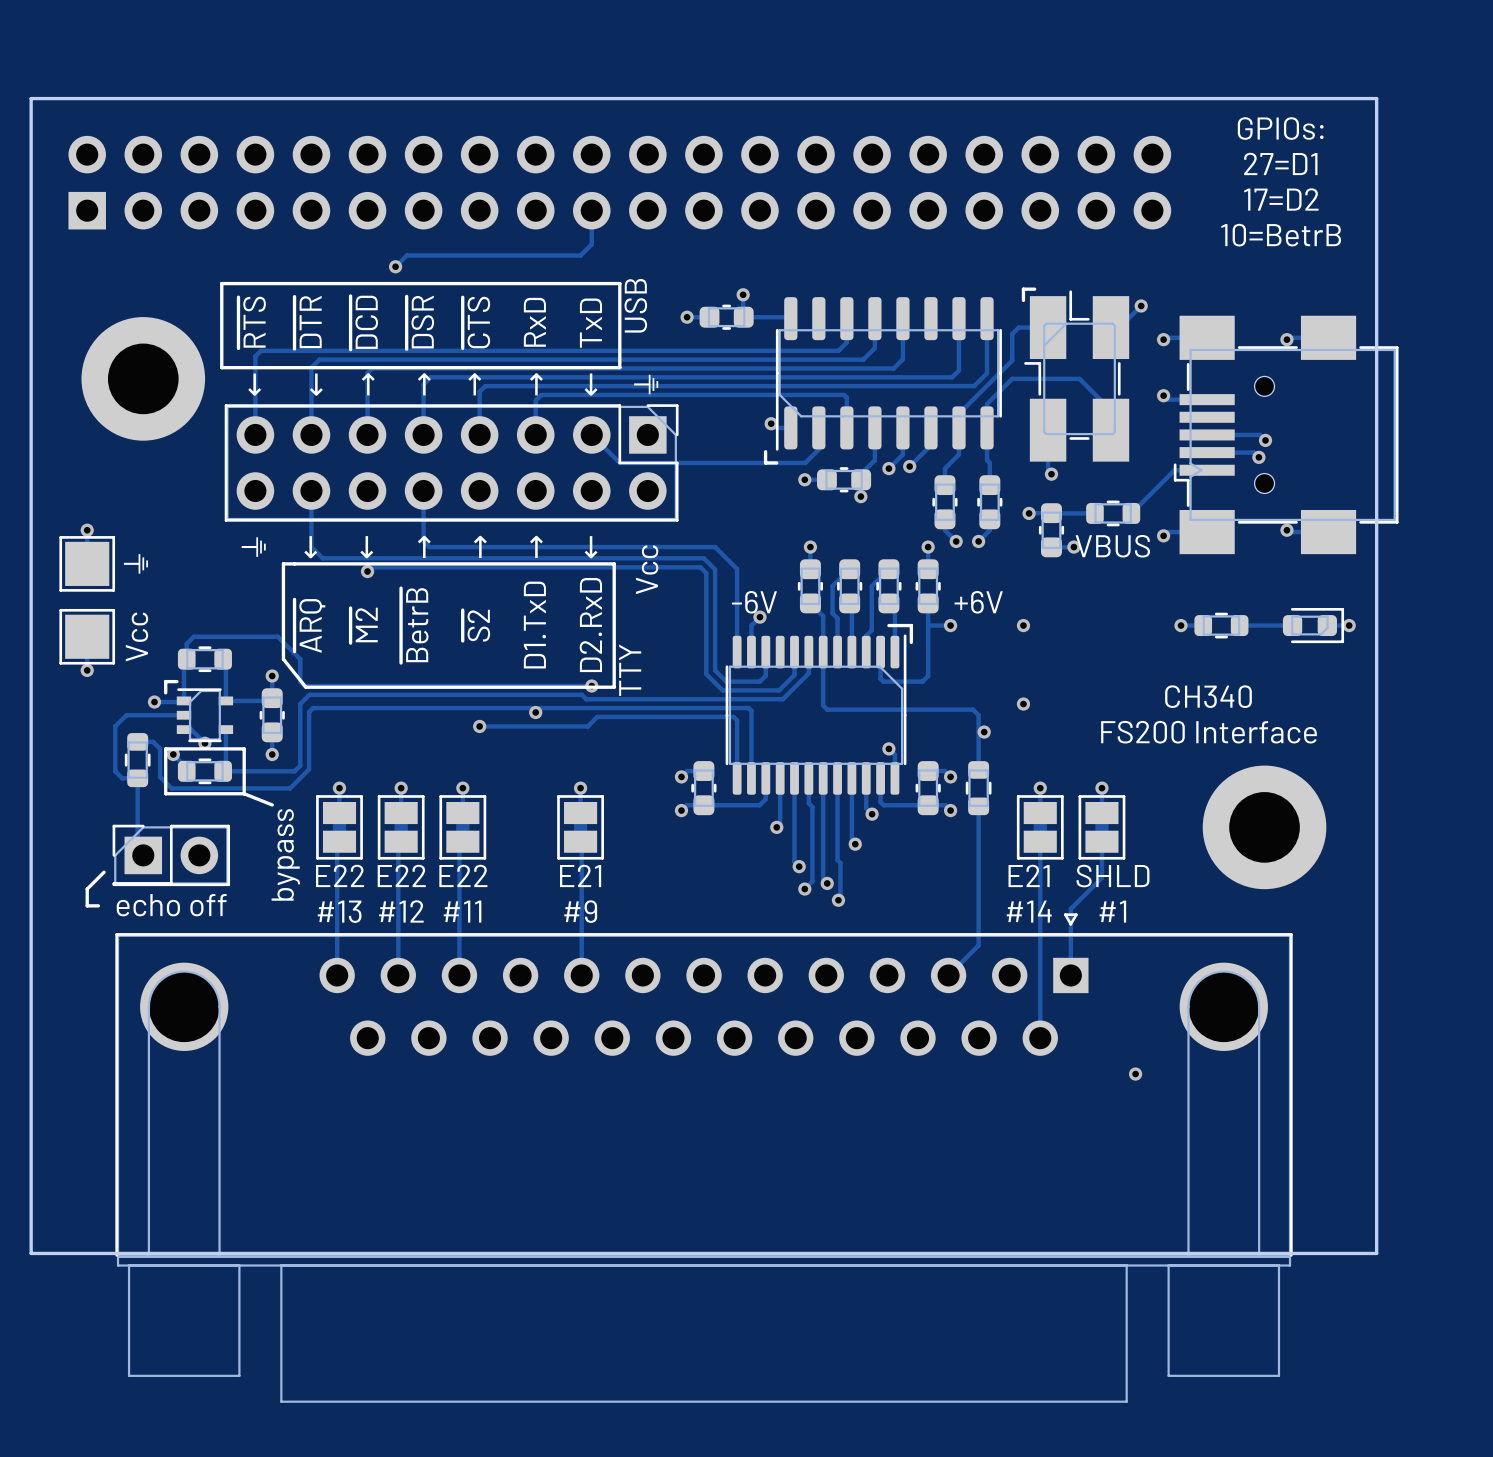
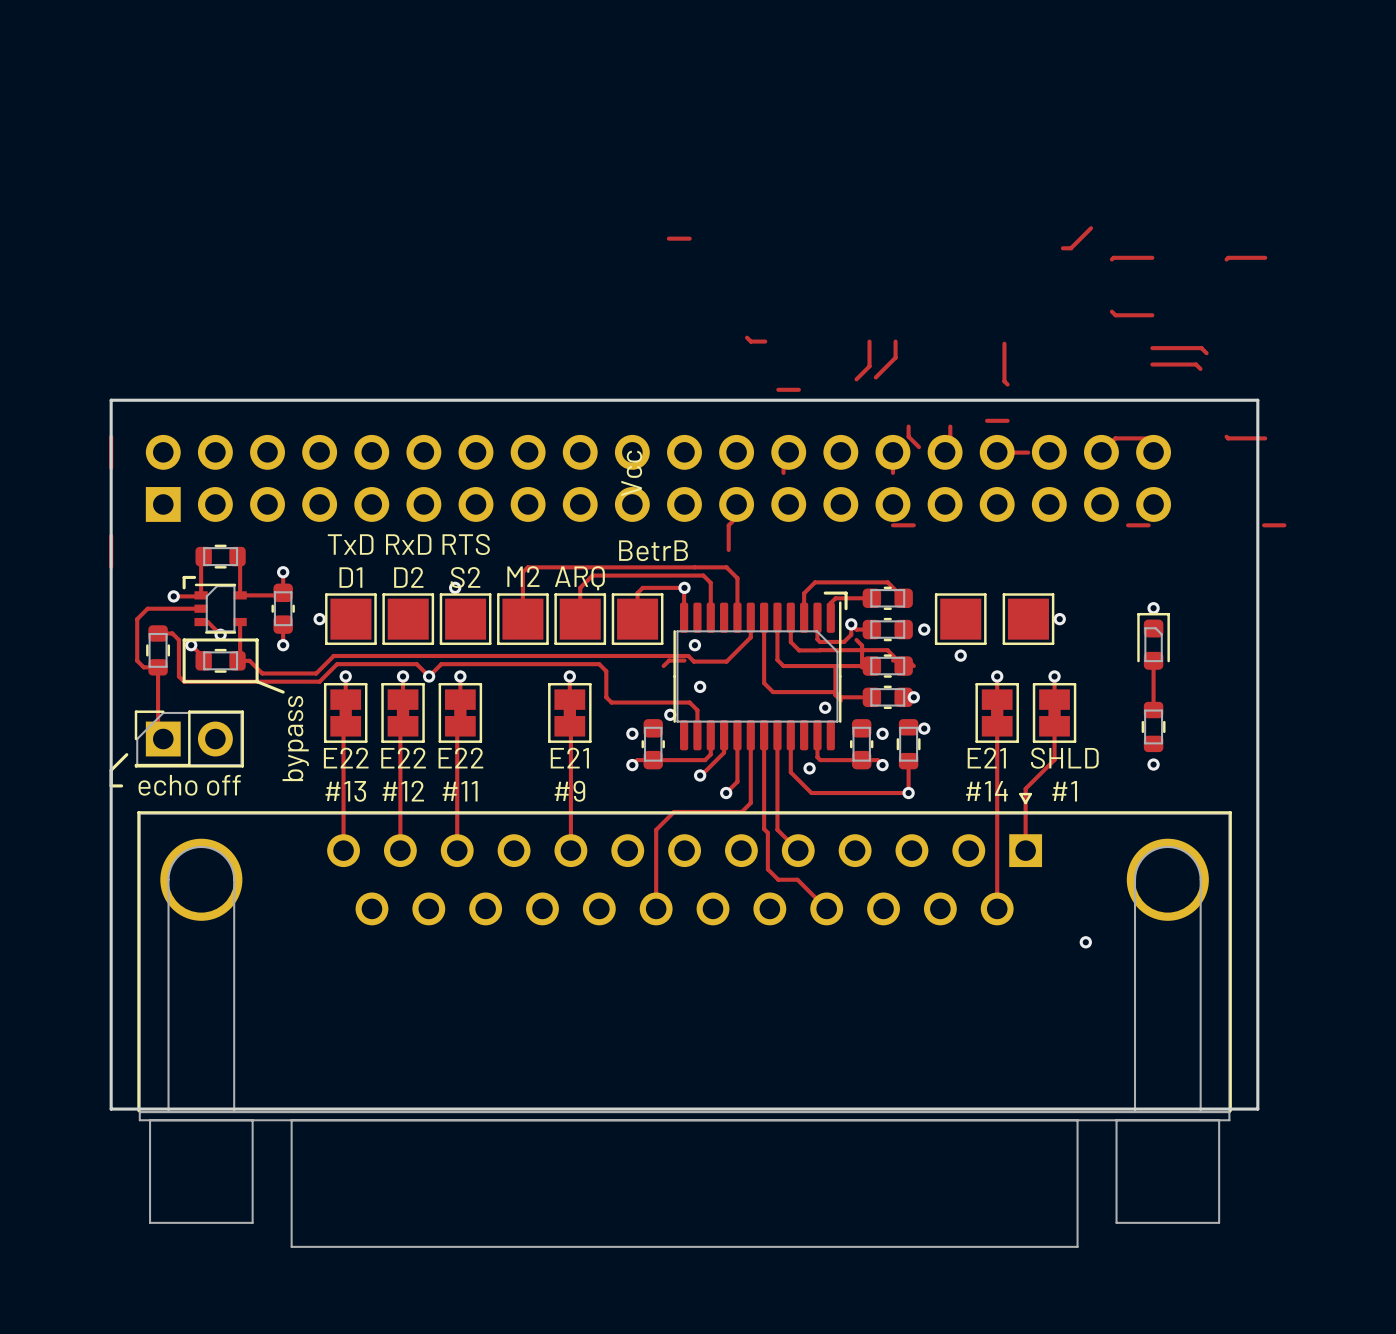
text: GPIOs: (1280, 128) -> none
text: 27=D1 (1280, 163) -> none
part position: (619, 182) -> (658, 478)
text: 17=D2 (1281, 199) -> none
track: (591, 210) (591, 244) (580, 255) (406, 255) (395, 266) -> none
text: 10=BetrB (1281, 235) -> none
via: (395, 266) -> none
line: (221, 283) (221, 367) (619, 367) (619, 283) (221, 283) -> none
line: (1034, 289) (1023, 289) (1023, 300) -> none
track: (743, 294) (743, 317) (789, 317) -> none
via: (743, 294) -> none
text: USB (635, 305) -> none
via: (1141, 306) -> none
via: (687, 317) -> none
part: (726, 317) -> none
track: (846, 318) (846, 342) (838, 350) (261, 350) (255, 356) (255, 434) -> none
track: (874, 318) (874, 348) (863, 359) (319, 359) (311, 367) (311, 434) -> none
track: (902, 318) (902, 359) (893, 368) (372, 368) (367, 373) (367, 434) -> none
track: (958, 318) (958, 370) (952, 377) (430, 377) (423, 384) (423, 434) -> none
track: (987, 318) (987, 373) (974, 386) (485, 386) (479, 391) (479, 434) -> none
text: ~{RTS} (252, 322) -> none
text: ~{DTR} (308, 322) -> none
text: ~{DCD} (364, 322) -> none
text: ~{DSR} (420, 322) -> none
text: ~{CTS} (476, 322) -> none
text rotation: 0° (534, 322) -> 90° clockwise (408, 544)
text position: RxD (534, 322) -> RxD (408, 544)
text rotation: 0° (590, 323) -> 90° clockwise (350, 544)
text position: TxD (590, 323) -> TxD (350, 544)
track: (1048, 327) (1018, 327) (1012, 334) (1012, 360) (958, 413) (958, 454) (944, 468) (944, 485) -> none
via: (1163, 339) -> none
via: (1286, 339) -> none
part: (888, 373) -> none
part: (1076, 376) -> none
part: (143, 378) -> none
text: → (254, 384) -> none
text: → (316, 384) -> none
text: → (368, 384) -> none
text: → (424, 384) -> none
text: → (474, 384) -> none
text: → (536, 384) -> none
text: → (591, 384) -> none
text: ⏚ (646, 384) -> none
via: (1163, 395) -> none
via: (771, 423) -> none
track: (818, 427) (818, 449) (805, 462) (619, 462) (591, 434) -> none
track: (846, 427) (846, 397) (844, 394) (541, 394) (535, 400) (535, 434) -> none
track: (874, 427) (874, 460) (861, 473) -> none
track: (1110, 430) (1110, 410) (1079, 378) (1012, 378) (987, 404) (987, 460) (989, 462) (989, 485) -> none
part: (1286, 434) -> none
via: (1265, 440) -> none
line: (765, 451) (765, 462) (776, 462) -> none
via: (1258, 457) -> none
part: (451, 462) -> none
via: (909, 466) -> none
via: (888, 468) -> none
track: (1207, 470) (1174, 470) (1131, 513) -> none
via: (1051, 474) -> none
via: (804, 479) -> none
part: (844, 479) -> none
track: (311, 491) (311, 547) (322, 558) (703, 558) (715, 569) (715, 670) (724, 679) -> (580, 619) (580, 587) (592, 575) (703, 575)
track: (423, 491) (423, 541) (429, 547) (715, 547) (737, 569) (737, 652) -> none
via: (860, 496) -> none
part: (944, 502) -> none
part: (989, 502) -> none
via: (1029, 513) -> none
track: (1051, 513) (1094, 513) -> none
part: (1113, 513) -> none
via: (87, 530) -> none
part: (1051, 530) -> none
via: (1286, 530) -> none
via: (1163, 535) -> none
via: (956, 541) -> none
via: (978, 541) -> none
text: → (424, 546) -> none
text: → (480, 546) -> none
text: → (536, 546) -> none
text: VBUS (1112, 546) -> none
text: ⏚ (253, 547) -> none
text: → (310, 547) -> none
text: → (366, 547) -> none
text: → (591, 547) -> none
via: (810, 547) -> none
via: (928, 547) -> none
via: (1073, 547) -> none
part: (87, 563) -> none
text: ⏚ (135, 563) -> none
line: (283, 563) (614, 563) (614, 687) (305, 687) (283, 659) (283, 563) -> none
track: (849, 569) (832, 586) (832, 613) (837, 618) (837, 652) -> none
track: (888, 569) (871, 586) (871, 630) (866, 635) (866, 652) -> none
track: (367, 571) (371, 567) (700, 567) (706, 573) (706, 674) (722, 690) (779, 690) (794, 675) (794, 652) -> none
via: (367, 571) -> none
part: (810, 586) -> none
part: (849, 586) -> none
part: (888, 586) -> none
part: (928, 586) -> none
text: -6V (754, 602) -> none
text: +6V (978, 602) -> none
track: (810, 603) (823, 616) (823, 705) (827, 709) (973, 709) (978, 715) (978, 769) -> none
track: (928, 603) (928, 676) (922, 681) (883, 681) (880, 678) (880, 652) -> none
track: (851, 605) (851, 652) -> none
track: (894, 609) (894, 652) -> none
via: (759, 617) -> none
text: ~{ARQ} (309, 625) -> none
text: ~{M2} (364, 625) -> none
text: ~{BetrB} (414, 625) -> none
text: ~{S2} (476, 625) -> none
text: D1.TxD (534, 625) -> none
text: D2.RxD (590, 625) -> none
line: (888, 625) (911, 625) (911, 642) -> (825, 593) (846, 593) (846, 608)
via: (950, 625) -> none
via: (1023, 625) -> none
via: (1181, 625) -> none
part: (1221, 625) -> none
track: (1239, 625) (1292, 625) -> none
part rotation: 0° (1313, 625) -> 90° counterclockwise (1153, 641)
part position: (1313, 625) -> (1153, 641)
via: (1349, 625) -> none
part: (87, 636) -> none
text: Vcc (136, 636) -> none
text: none -> RTS (466, 544)
text: none -> BetrB (653, 550)
track: (765, 652) (765, 675) (759, 681) (726, 681) -> (710, 617) (710, 582) (705, 577)
track: (808, 652) (808, 673) (782, 699) (586, 699) (581, 694) (309, 694) (300, 704) (300, 765) (294, 771) (236, 771) -> (750, 617) (750, 637) (726, 661) (693, 661) (688, 655) (333, 655) (316, 673) (262, 673) (249, 660)
track: (186, 659) (186, 643) (193, 636) (277, 636) (300, 659) (300, 681) (304, 686) (591, 686) -> none
via: (87, 670) -> none
text: TTY (630, 670) -> none
text: none -> M2 (523, 576)
text: none -> D1 (350, 577)
text: none -> D2 (408, 577)
text: none -> S2 (465, 577)
text: none -> ARQ (579, 578)
via: (591, 686) -> none
via: none -> (455, 587)
via: none -> (684, 587)
text: CH340 (1208, 696) -> none
track: none -> (871, 598) (835, 598) (830, 603) (830, 617)
part: none -> (887, 598)
track: none -> (903, 598) (887, 582) (815, 582) (804, 593) (804, 617)
via: (1023, 704) -> none
via: (535, 712) -> none
part position: (816, 714) -> (757, 675)
via: none -> (1153, 608)
track: none -> (684, 617) (684, 587) (642, 587) (637, 593) (637, 619)
track: none -> (737, 617) (737, 578) (726, 567) (527, 567) (522, 572) (522, 619)
track: none -> (764, 617) (764, 683) (773, 692) (835, 692) (840, 697) (861, 697)
track: none -> (777, 617) (777, 659) (783, 666) (871, 666)
track: none -> (790, 617) (790, 642) (799, 650) (820, 650)
track: none -> (817, 617) (817, 639) (820, 641) (844, 641) (851, 634) (851, 624) (856, 629) (871, 629)
via: none -> (319, 619)
part: none -> (350, 619)
part: none -> (408, 619)
part: none -> (465, 619)
track: (479, 726) (587, 726) (597, 716) (733, 716) (737, 720) (737, 778) -> none
via: (479, 726) -> none
part: none -> (522, 619)
part: none -> (580, 619)
part: none -> (637, 619)
part: none -> (960, 619)
part: none -> (1028, 619)
via: none -> (1059, 619)
via: (984, 732) -> none
text: FS200 Interface (1208, 732) -> none
part: none -> (887, 629)
via: none -> (924, 629)
via position: (888, 748) -> (851, 624)
via: none -> (694, 645)
track: none -> (820, 650) (887, 650) (903, 666)
via: none -> (960, 655)
track: none -> (1153, 660) (1153, 710)
track: (160, 776) (171, 788) (290, 788) (309, 769) (309, 712) (313, 708) (531, 708) (535, 712) (540, 708) (748, 708) (751, 710) (751, 778) -> (178, 666) (178, 676) (184, 681) (319, 681) (337, 664) (416, 664) (429, 676) (441, 664) (599, 664) (606, 671) (606, 697) (611, 702) (689, 702) (697, 710) (697, 735)
via: (681, 776) -> none
part: none -> (887, 666)
via: (950, 776) -> none
track: (765, 778) (765, 799) (759, 805) (686, 805) (681, 810) -> (710, 735) (710, 754) (705, 760) (637, 760) (632, 765)
track: (780, 778) (780, 824) (776, 827) -> none
track: (794, 778) (794, 861) (799, 866) -> none
track: (808, 778) (808, 803) (812, 806) (812, 881) (804, 889) -> none
track: (823, 778) (823, 879) (827, 883) -> none
track: (837, 778) (837, 860) (840, 863) (840, 898) (838, 900) -> none
track: (851, 778) (851, 840) (855, 844) -> none
track: (880, 778) (880, 802) (883, 805) (945, 805) (950, 810) -> (817, 735) (817, 757) (820, 760) (877, 760) (882, 765)
via: none -> (429, 676)
part position: (703, 788) -> (653, 744)
part: (928, 788) -> none
part position: (978, 788) -> (908, 744)
via: none -> (700, 686)
track: (978, 806) (978, 945) (948, 975) -> none
via position: (681, 810) -> (670, 714)
part: none -> (887, 697)
via: (872, 814) -> none
via: none -> (825, 707)
via: (776, 827) -> none
part: (1264, 827) -> none
part: none -> (1153, 726)
via: (855, 844) -> none
via: none -> (924, 728)
via: none -> (632, 733)
via: none -> (882, 733)
track: none -> (724, 735) (724, 752) (700, 775)
track: none -> (737, 735) (737, 781) (726, 793)
track: none -> (750, 735) (750, 803) (741, 811) (674, 811) (656, 829) (656, 908)
track: none -> (764, 735) (764, 829) (767, 832) (767, 869) (778, 879) (797, 879) (826, 908)
track: none -> (777, 735) (777, 829) (798, 850)
track: none -> (790, 735) (790, 772) (811, 793) (908, 793) (908, 761)
part: none -> (861, 744)
via: (799, 866) -> none
via: none -> (1153, 764)
via: none -> (632, 765)
via: (827, 883) -> none
via: none -> (882, 765)
via: none -> (809, 768)
via: (804, 889) -> none
via: none -> (700, 775)
via: (838, 900) -> none
via: none -> (726, 793)
via: none -> (908, 793)
board edge: (87, 1253) (31, 1253) (31, 98) (1376, 98) (1376, 1253) (1320, 1253) -> (111, 1109) (111, 400) (1257, 400) (1257, 1109)

